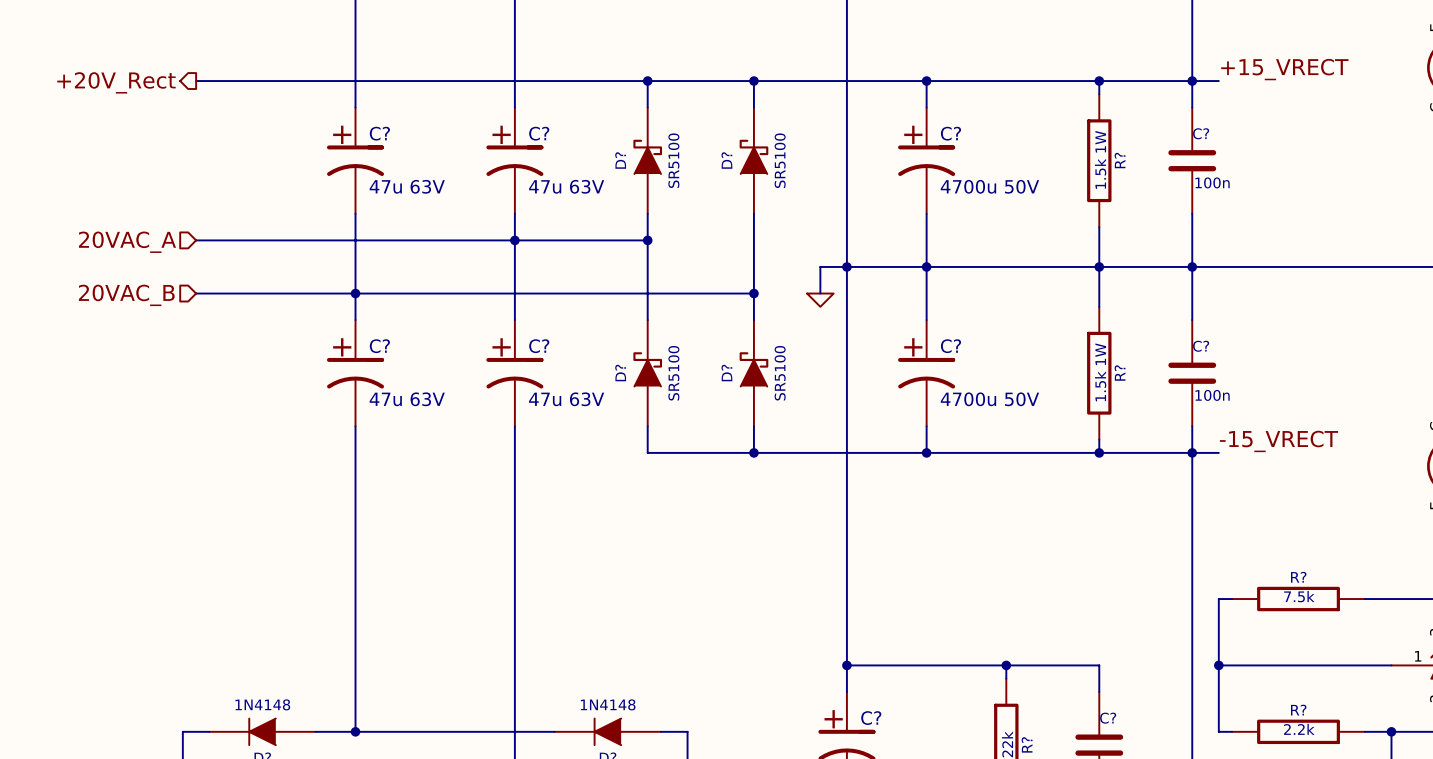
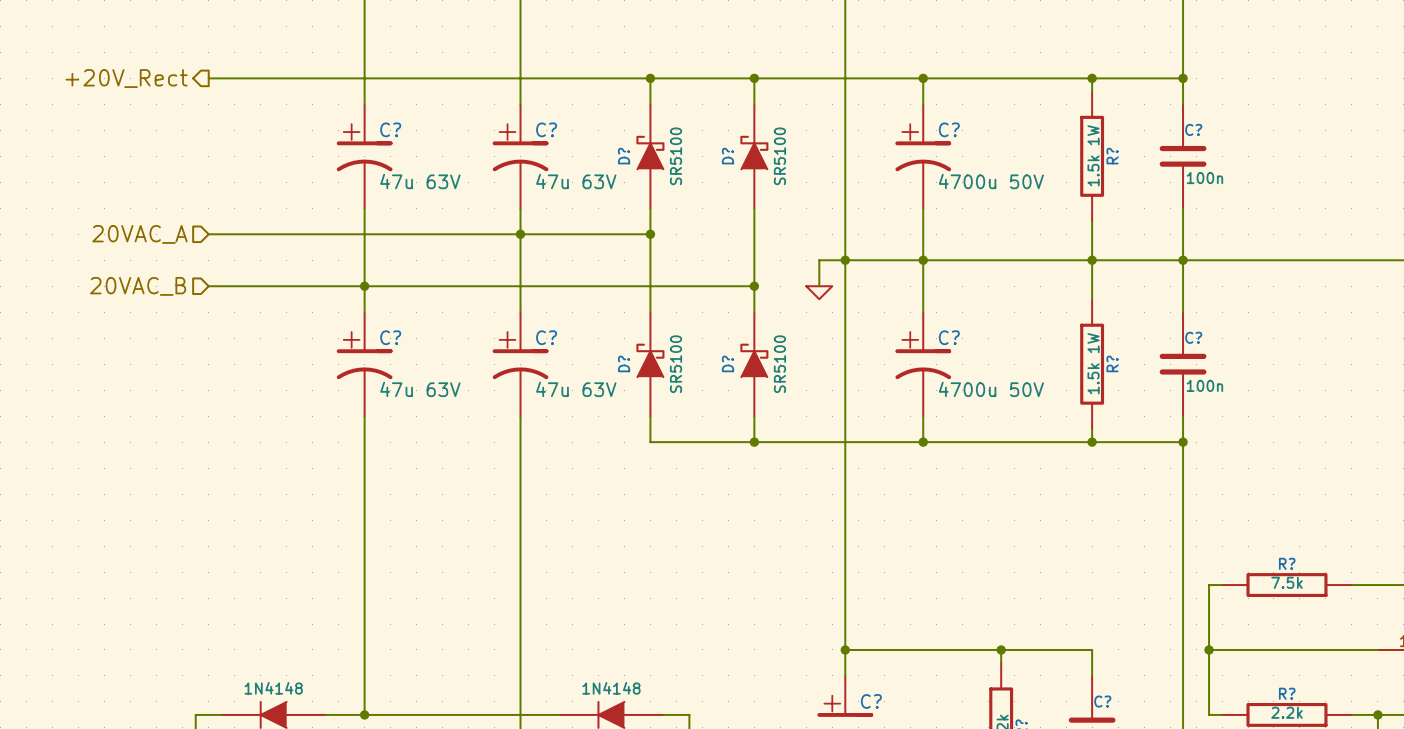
label: +15_VRECT (1284, 69) -> none
wire: (1192, 81) (1218, 81) -> none
label: -15_VRECT (1278, 441) -> none
wire: (1192, 452) (1218, 452) -> none

